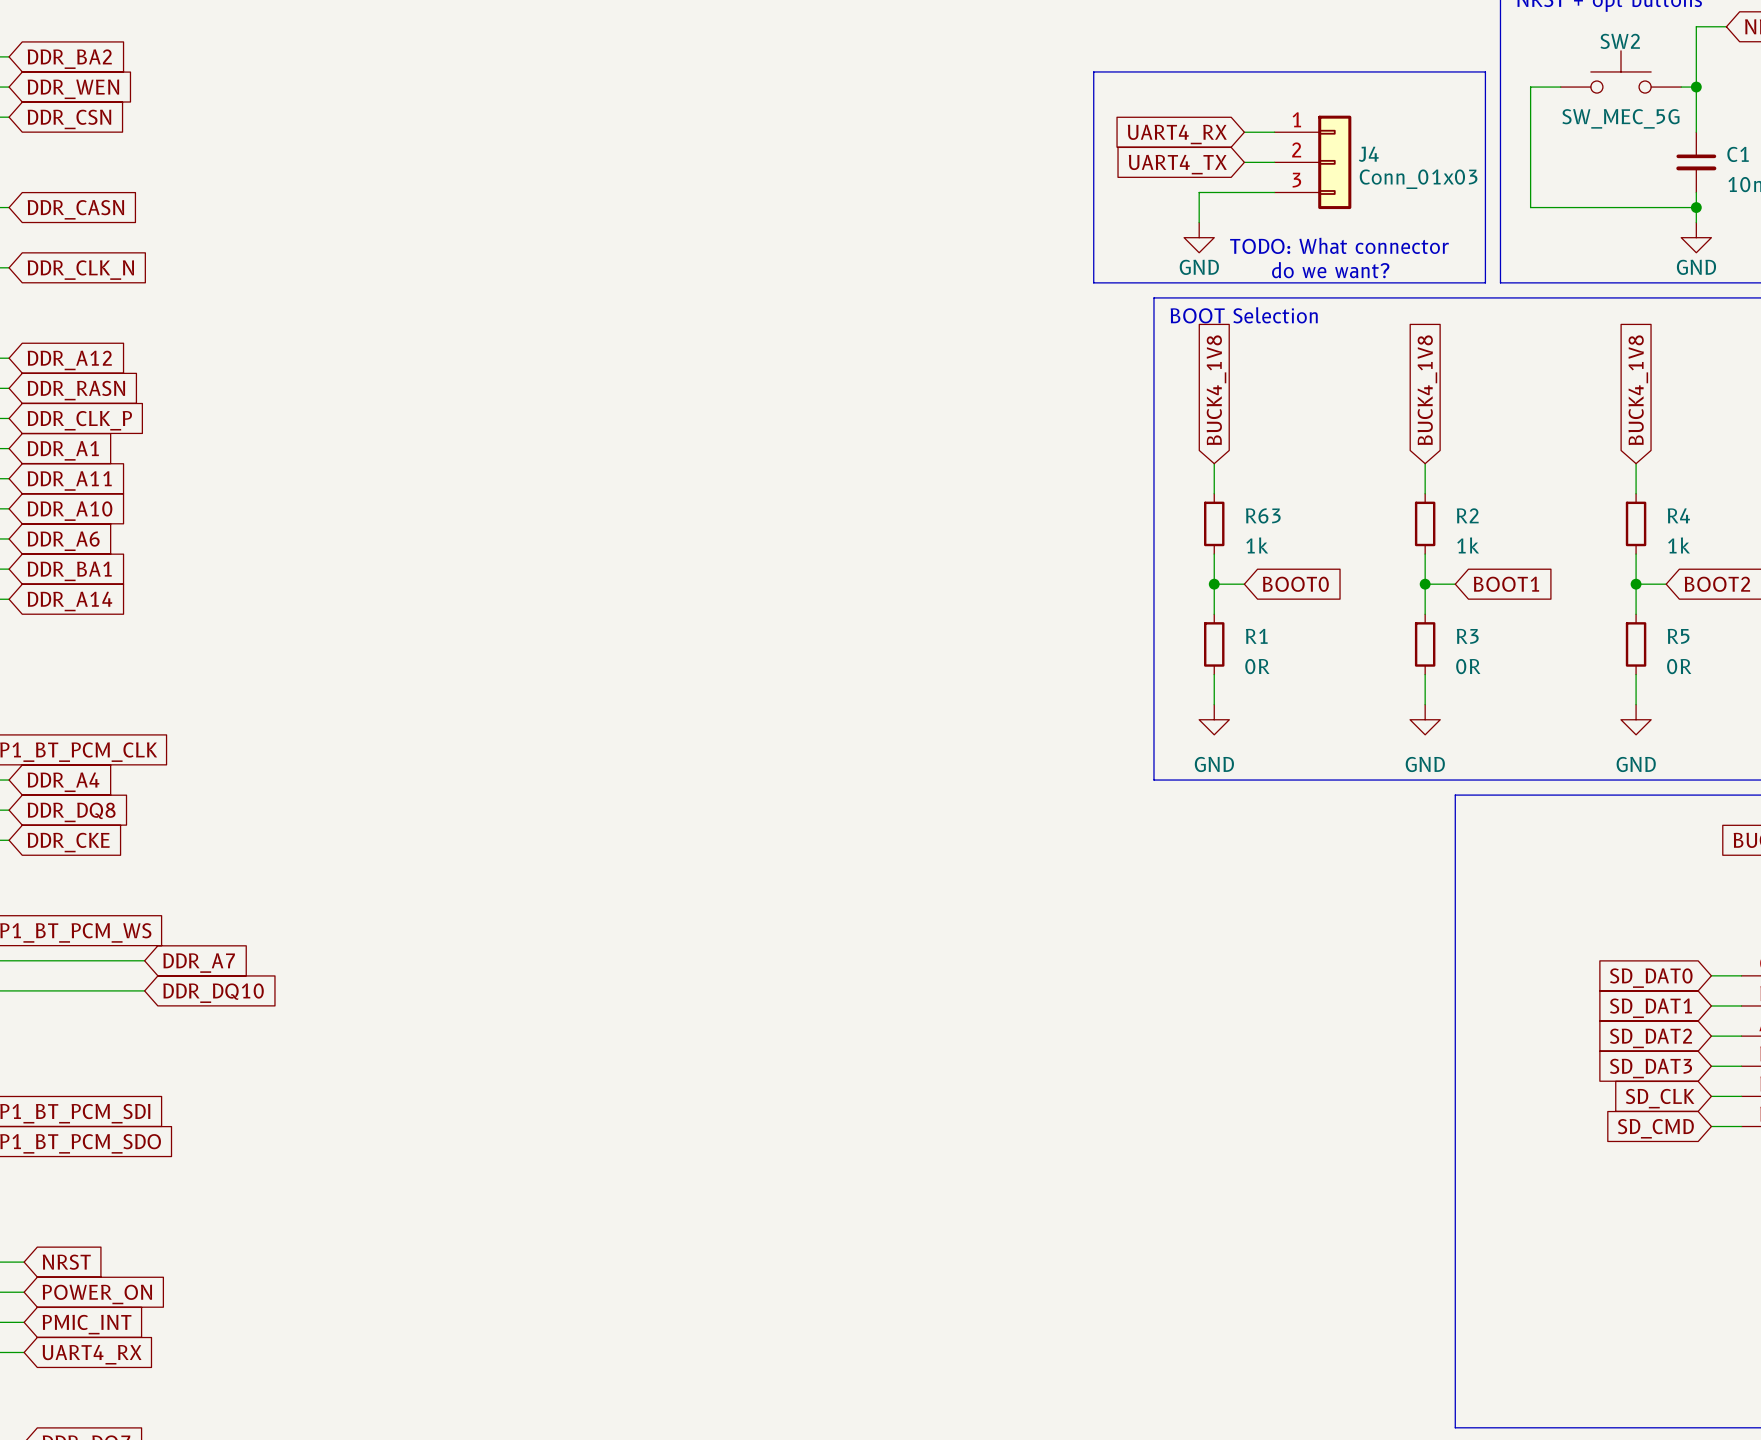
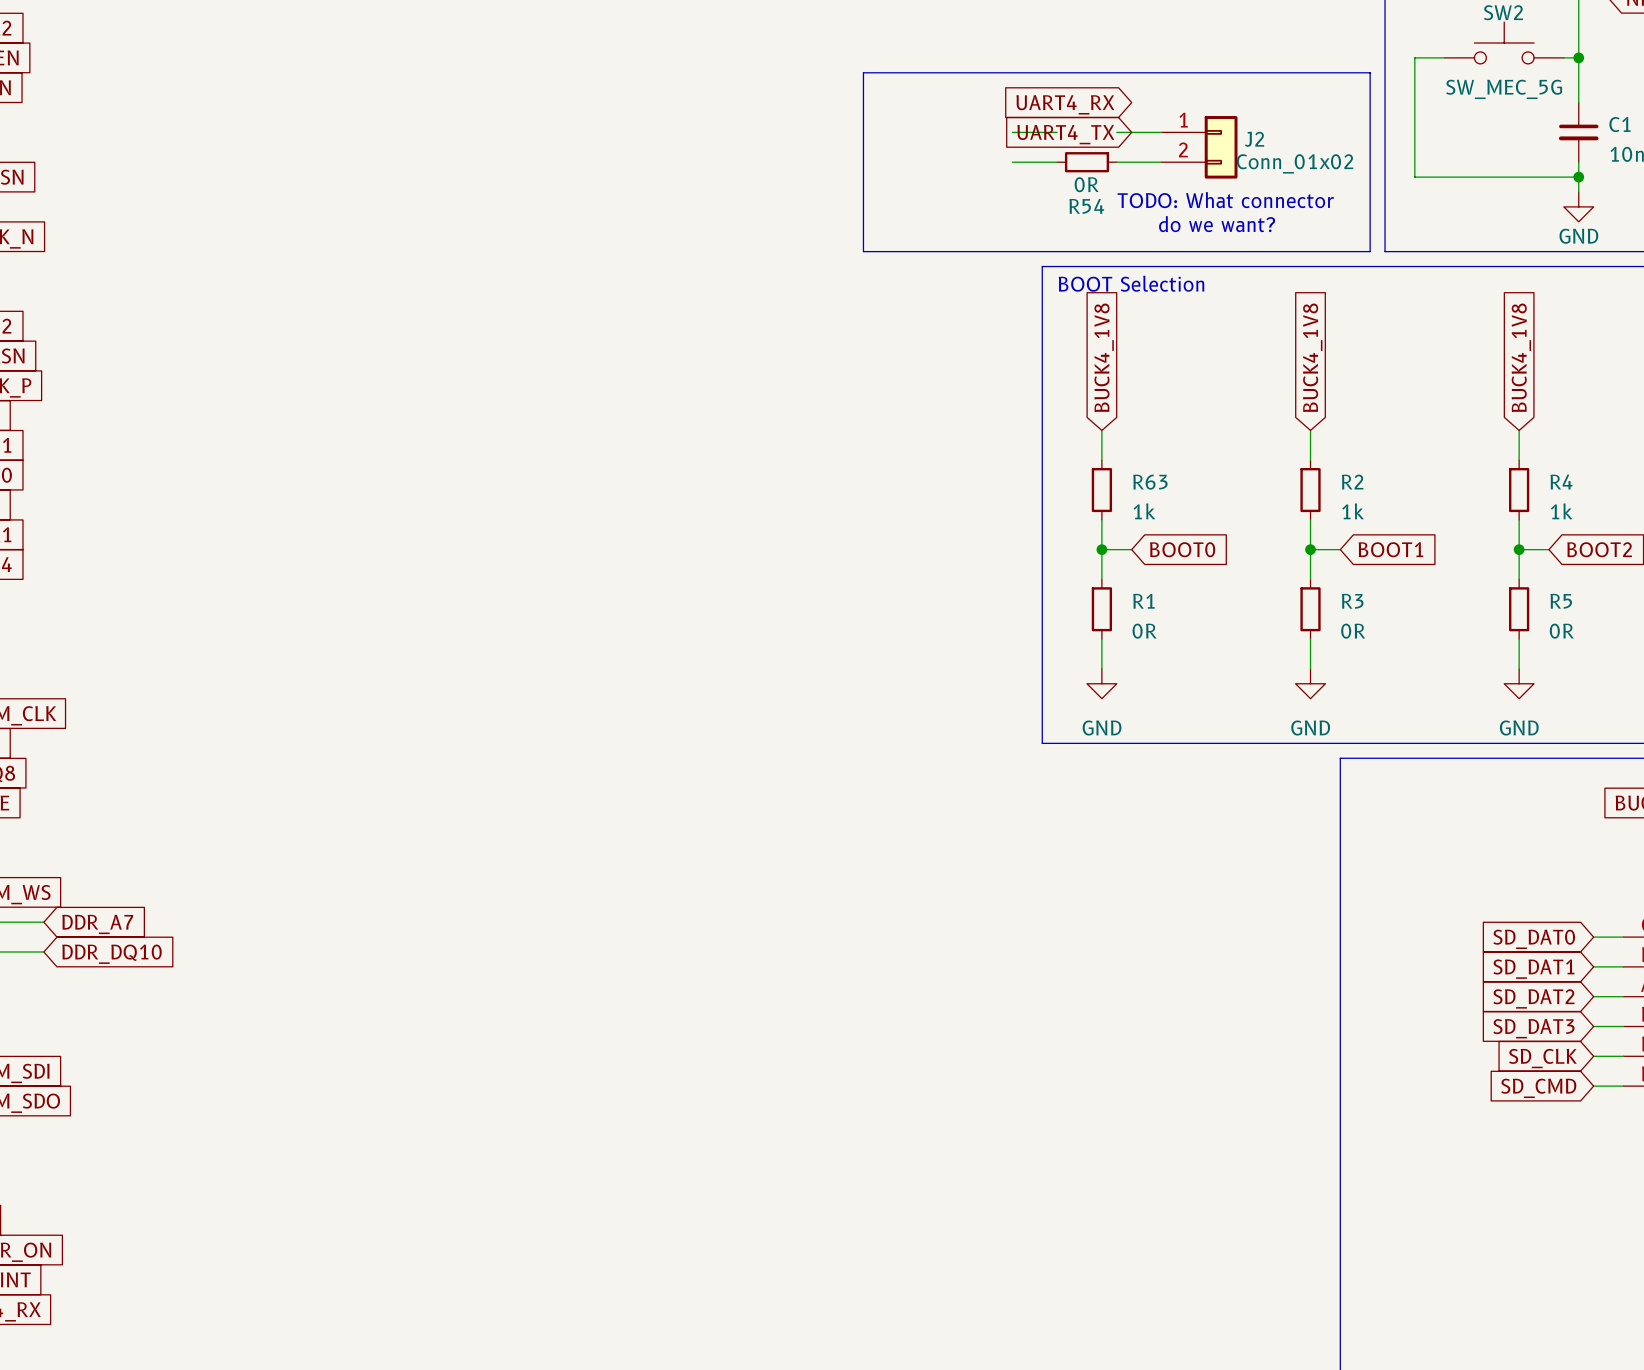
line: (1485, 102) (1485, 71) (1093, 71) (1093, 282) -> (1370, 72) (863, 72) (863, 251) (982, 251)
wire: (1244, 132) (1274, 132) -> none
wire: none -> (1012, 132) (1057, 132)
wire: none -> (1116, 132) (1131, 132)
J4: Conn_01x03 (1312, 162) -> none
J2: none -> Conn_01x02 (1199, 147)
wire: none -> (1012, 162) (1057, 162)
R54: none -> 0R (1086, 162)
wire: (1229, 192) (1199, 192) (1199, 222) -> none
power symbol: GND (1199, 237) -> none
text position: TODO: What connector (1339, 245) -> TODO: What connector (1225, 200)
text position: do we want? (1330, 270) -> do we want? (1217, 224)

